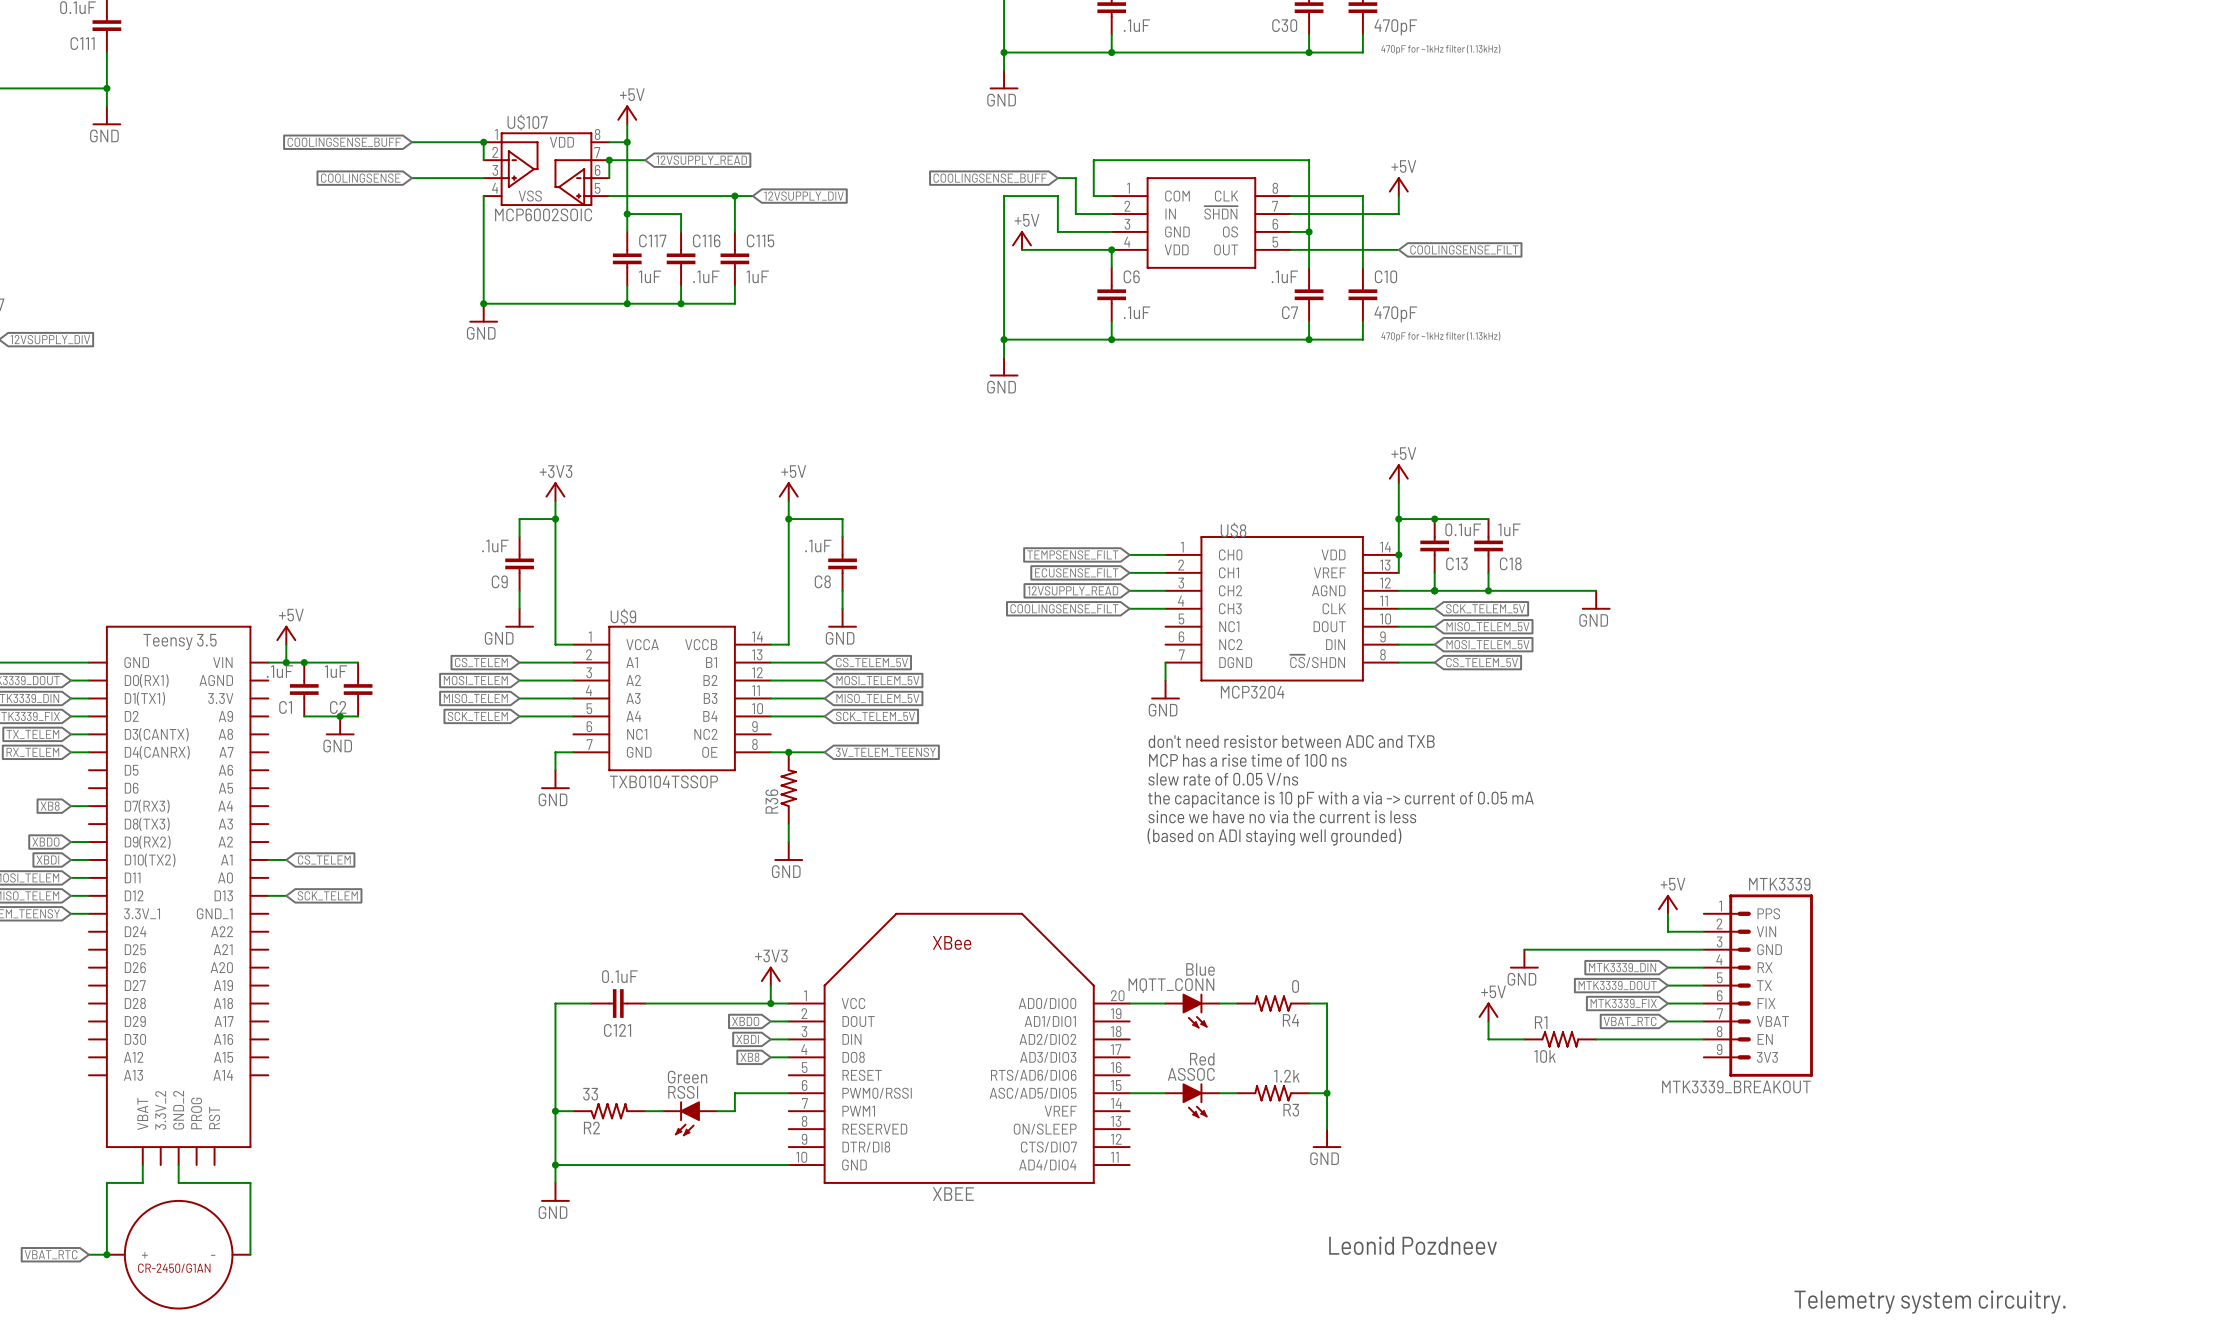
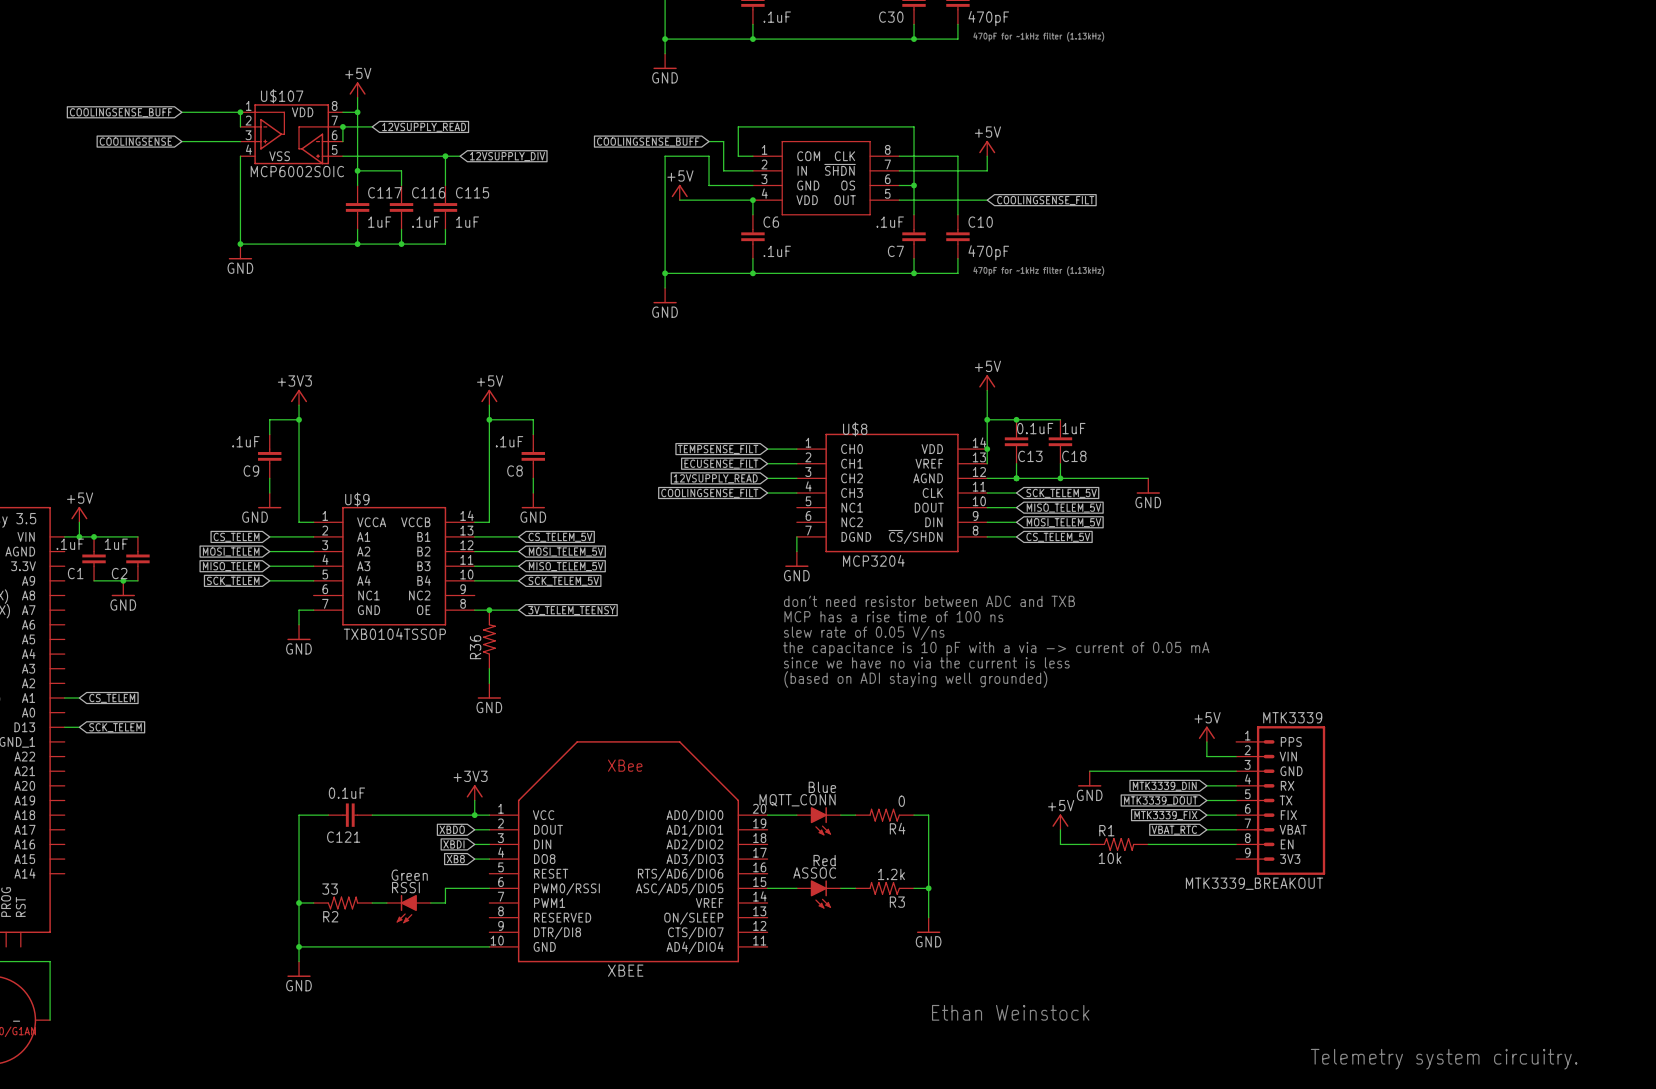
text: Leonid Pozdneev (1413, 1245) -> Ethan Weinstock (1010, 1012)

